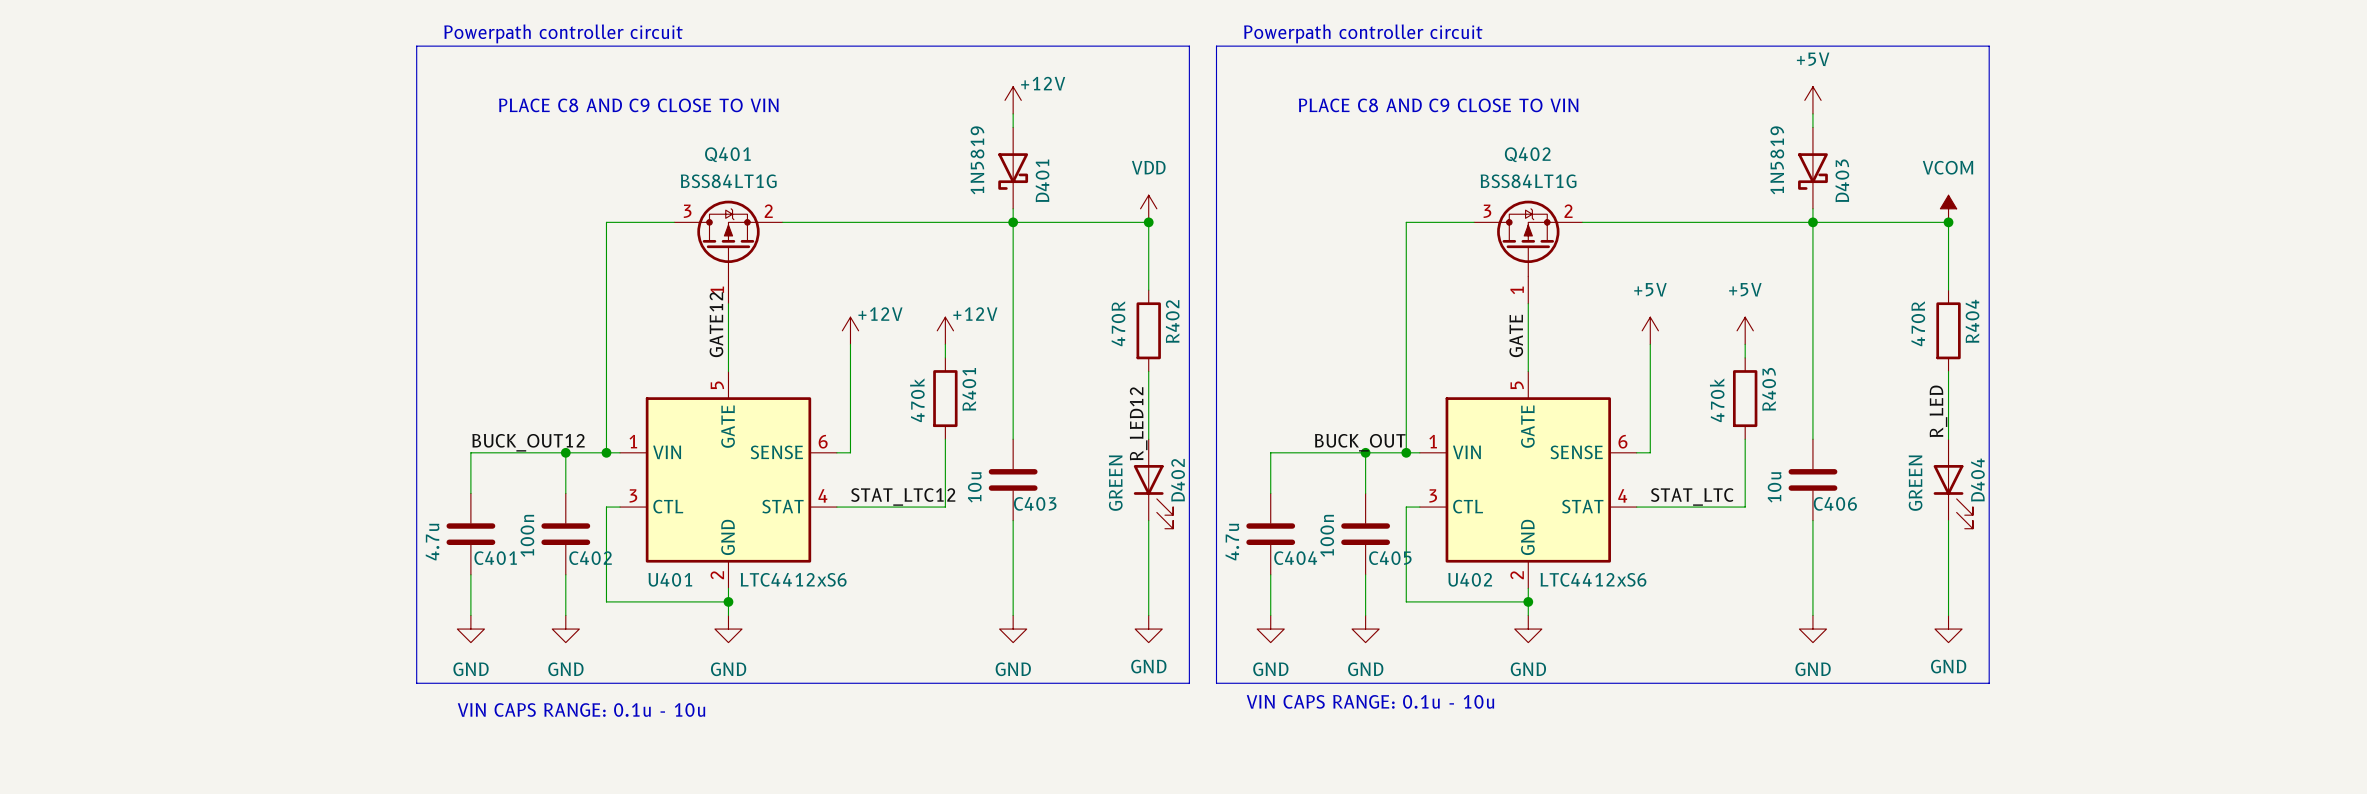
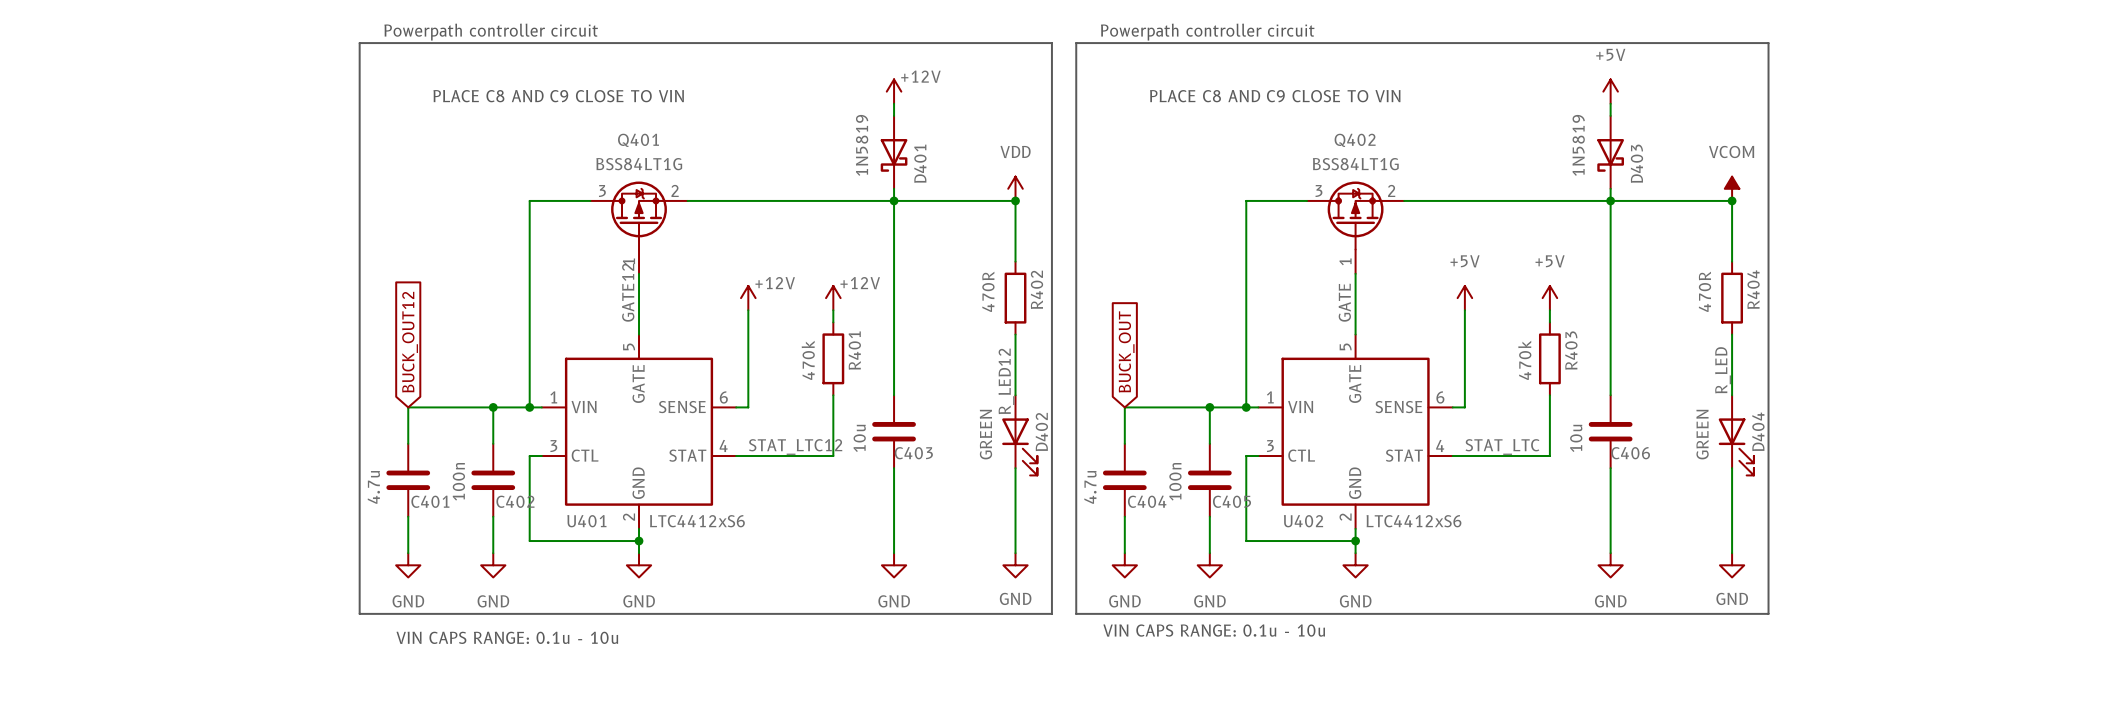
global label: none -> BUCK_OUT12 (410, 342)
global label: none -> BUCK_OUT (1126, 351)
label: BUCK_OUT12 (528, 442) -> none
label: BUCK_OUT (1360, 442) -> none

